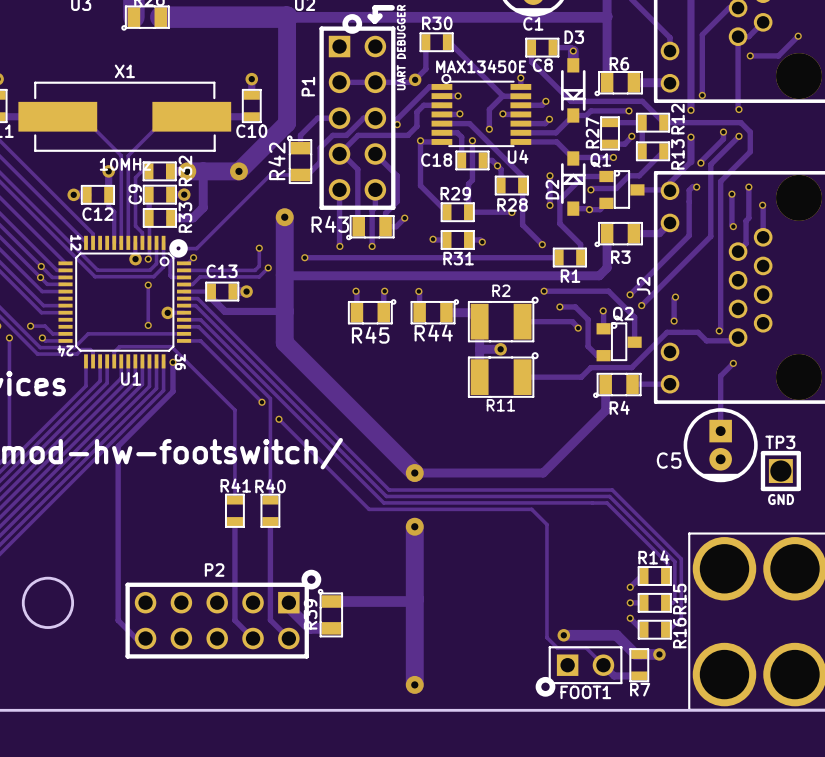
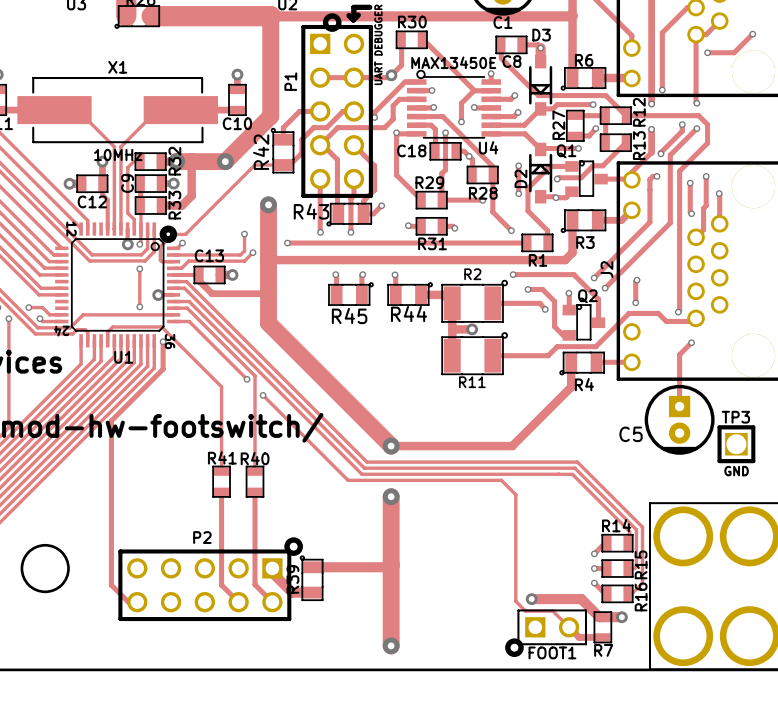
via: (41, 266) -> none
via: (40, 277) -> none

